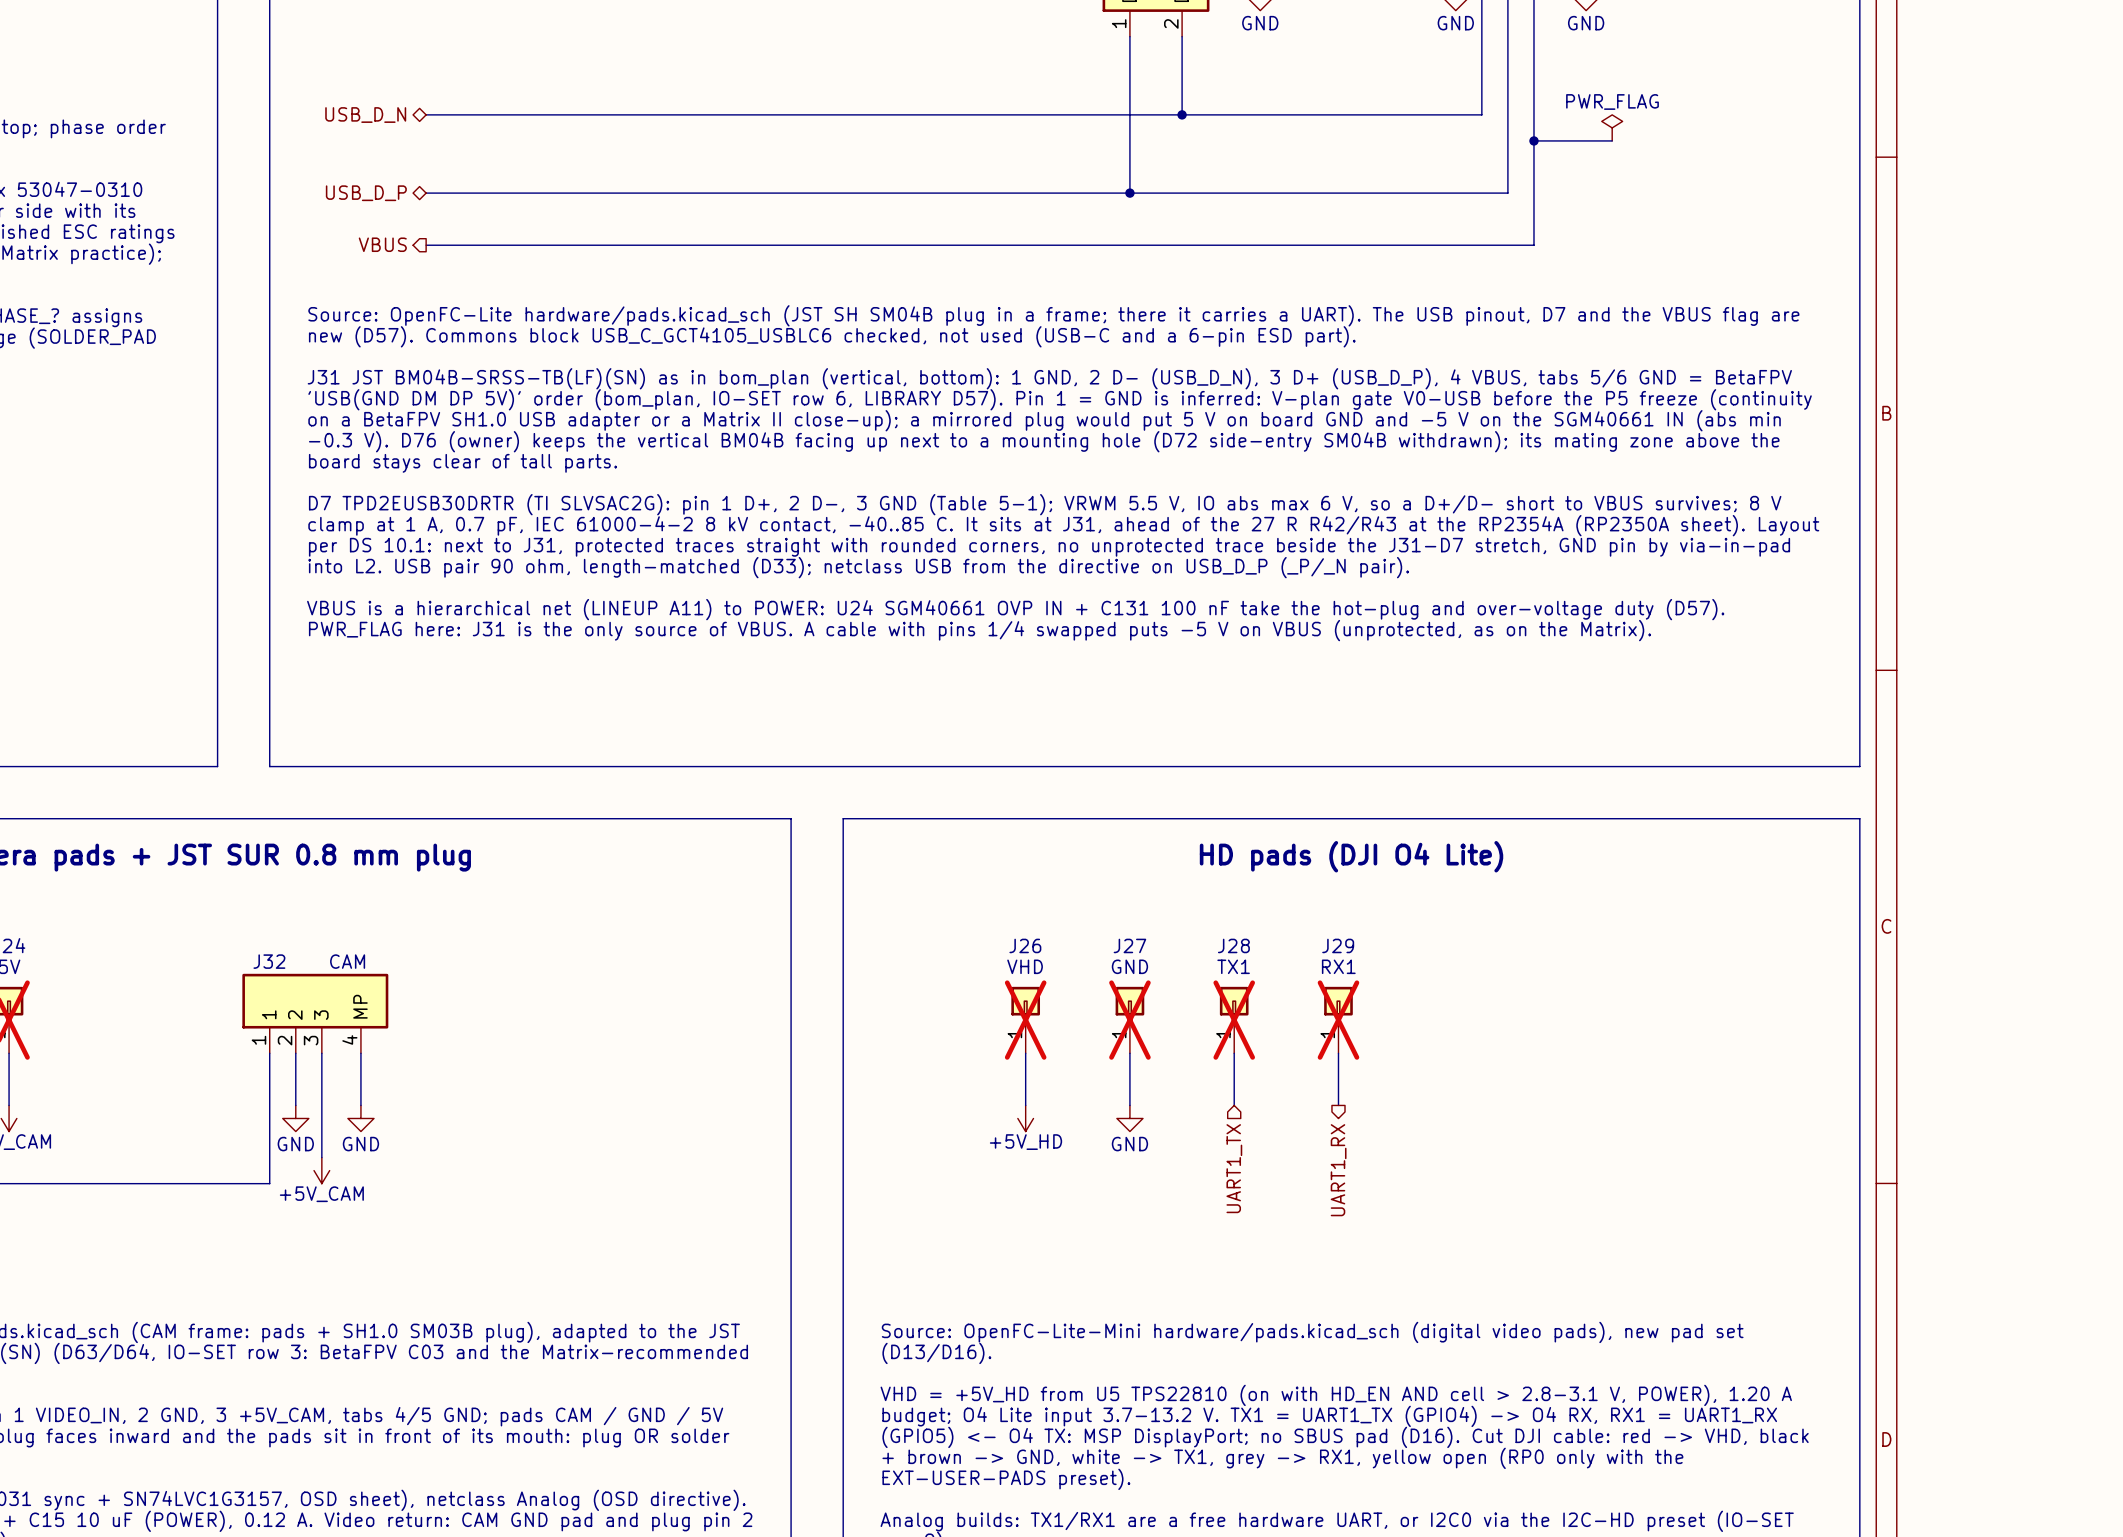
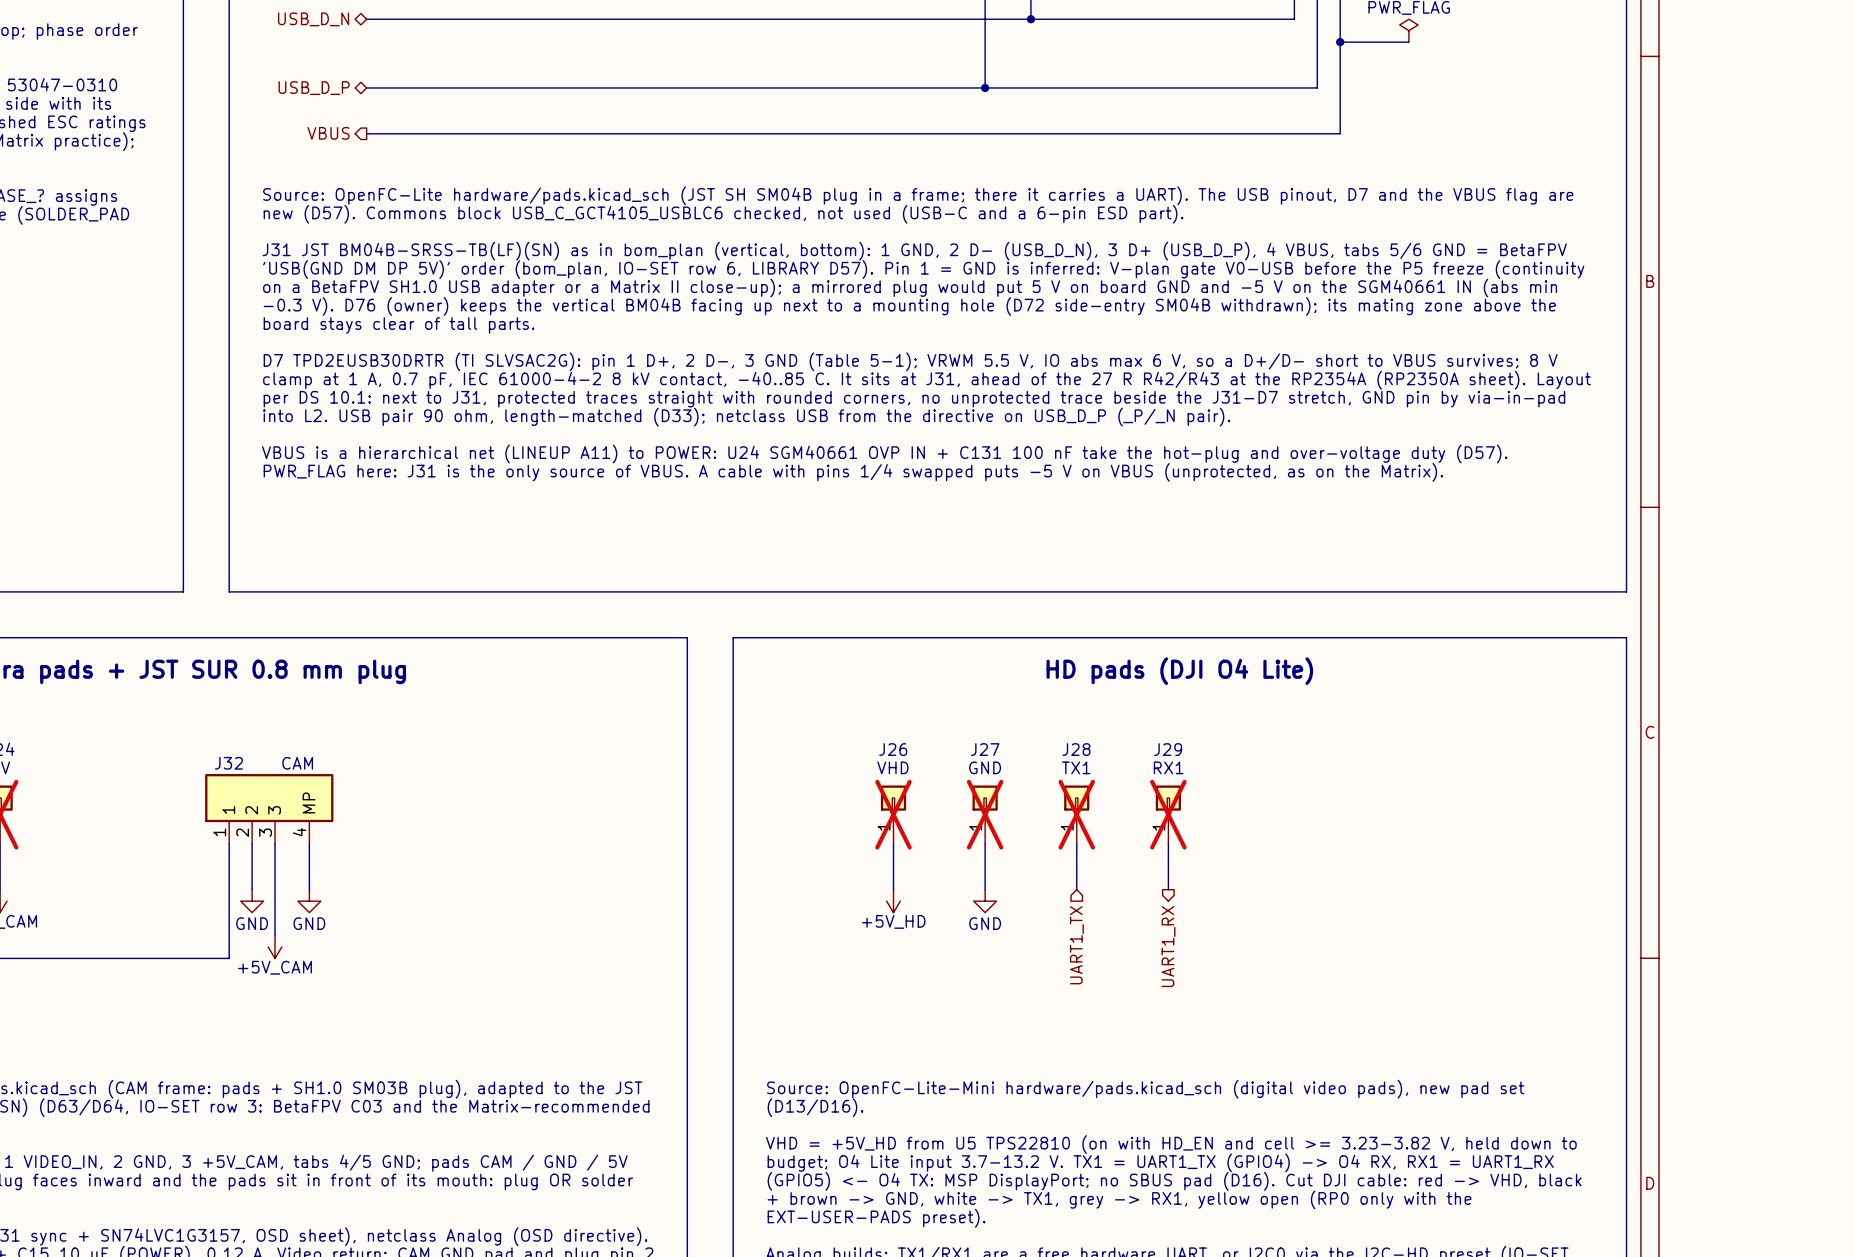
text: VHD = +5V_HD from U5 TPS22810 (on with HD_EN AND cell > 2.8-3.1 V, POWER), 1.20 A (1336, 1395) -> VHD = +5V_HD from U5 TPS22810 (on with HD_EN and cell >= 3.23-3.82 V, held down to (1171, 1144)

